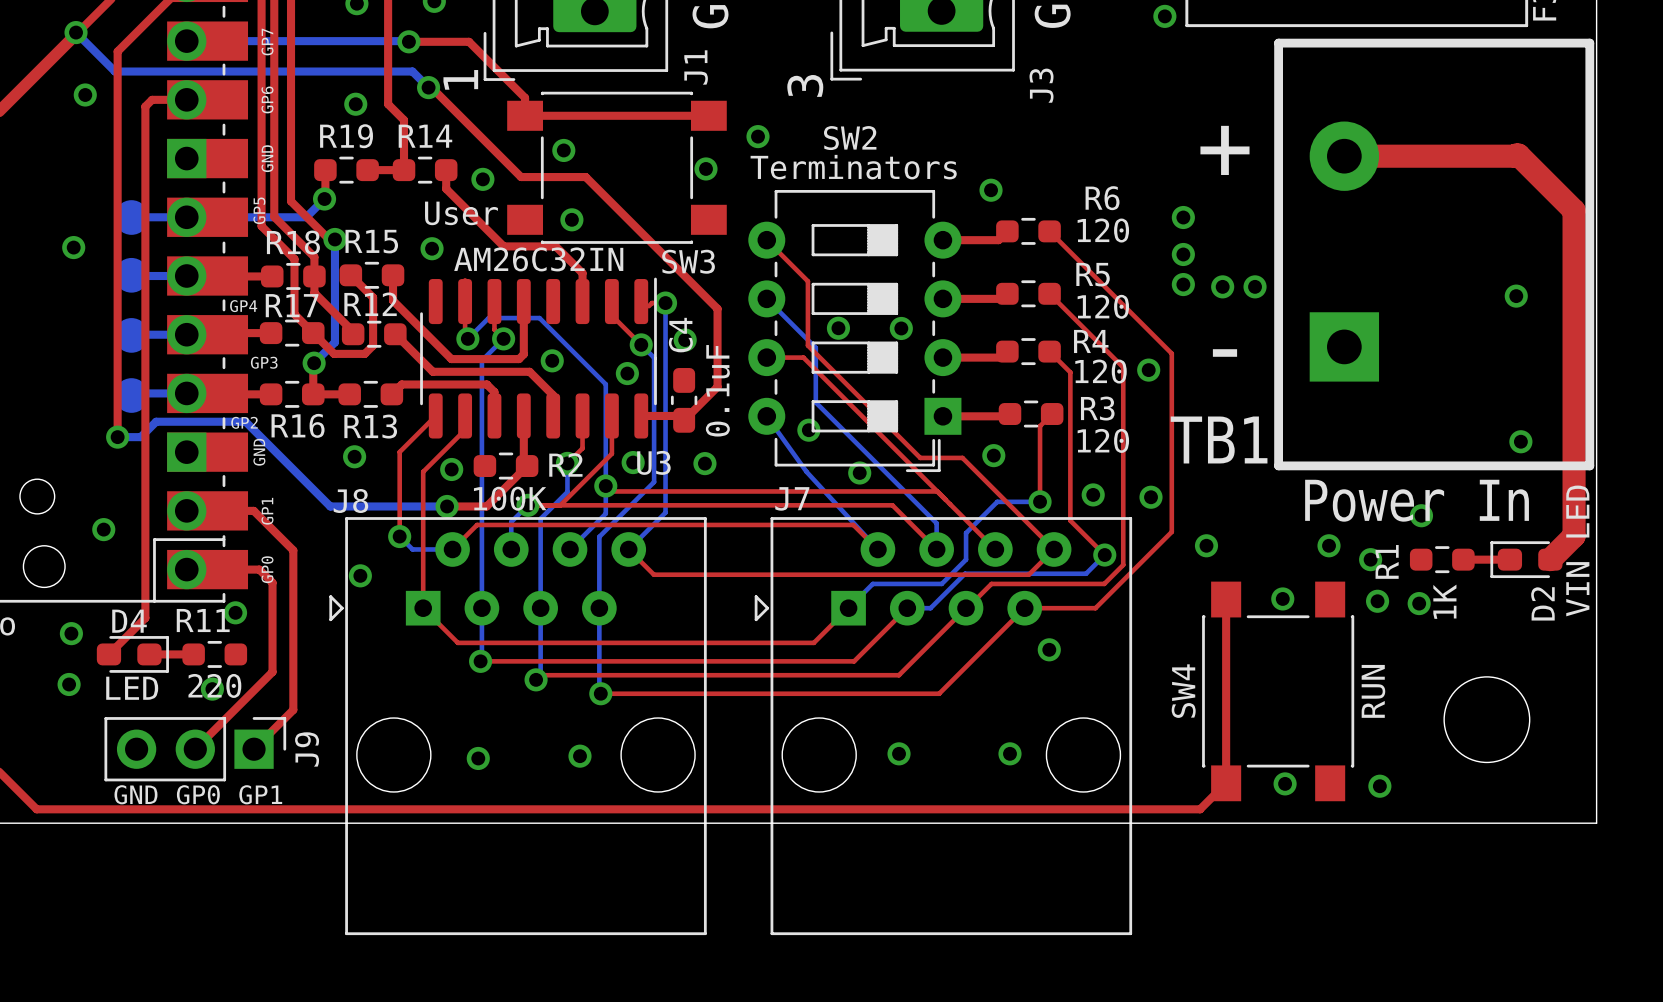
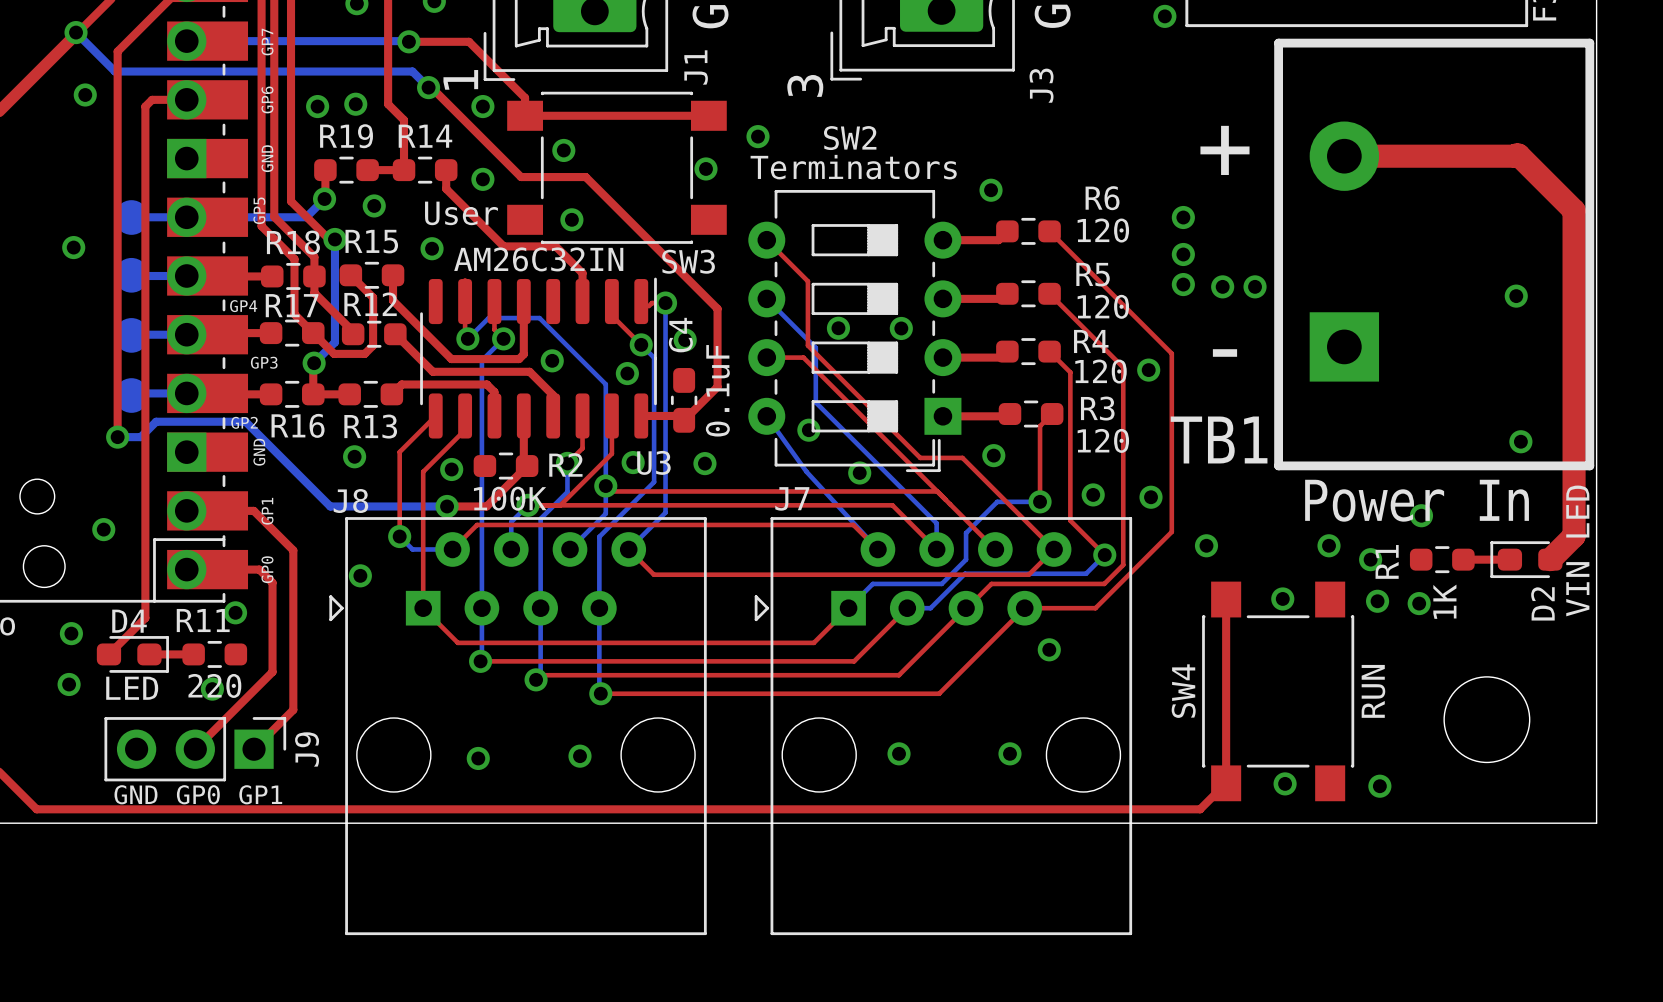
via: none -> (317, 106)
via: none -> (482, 106)
via: none -> (374, 205)

